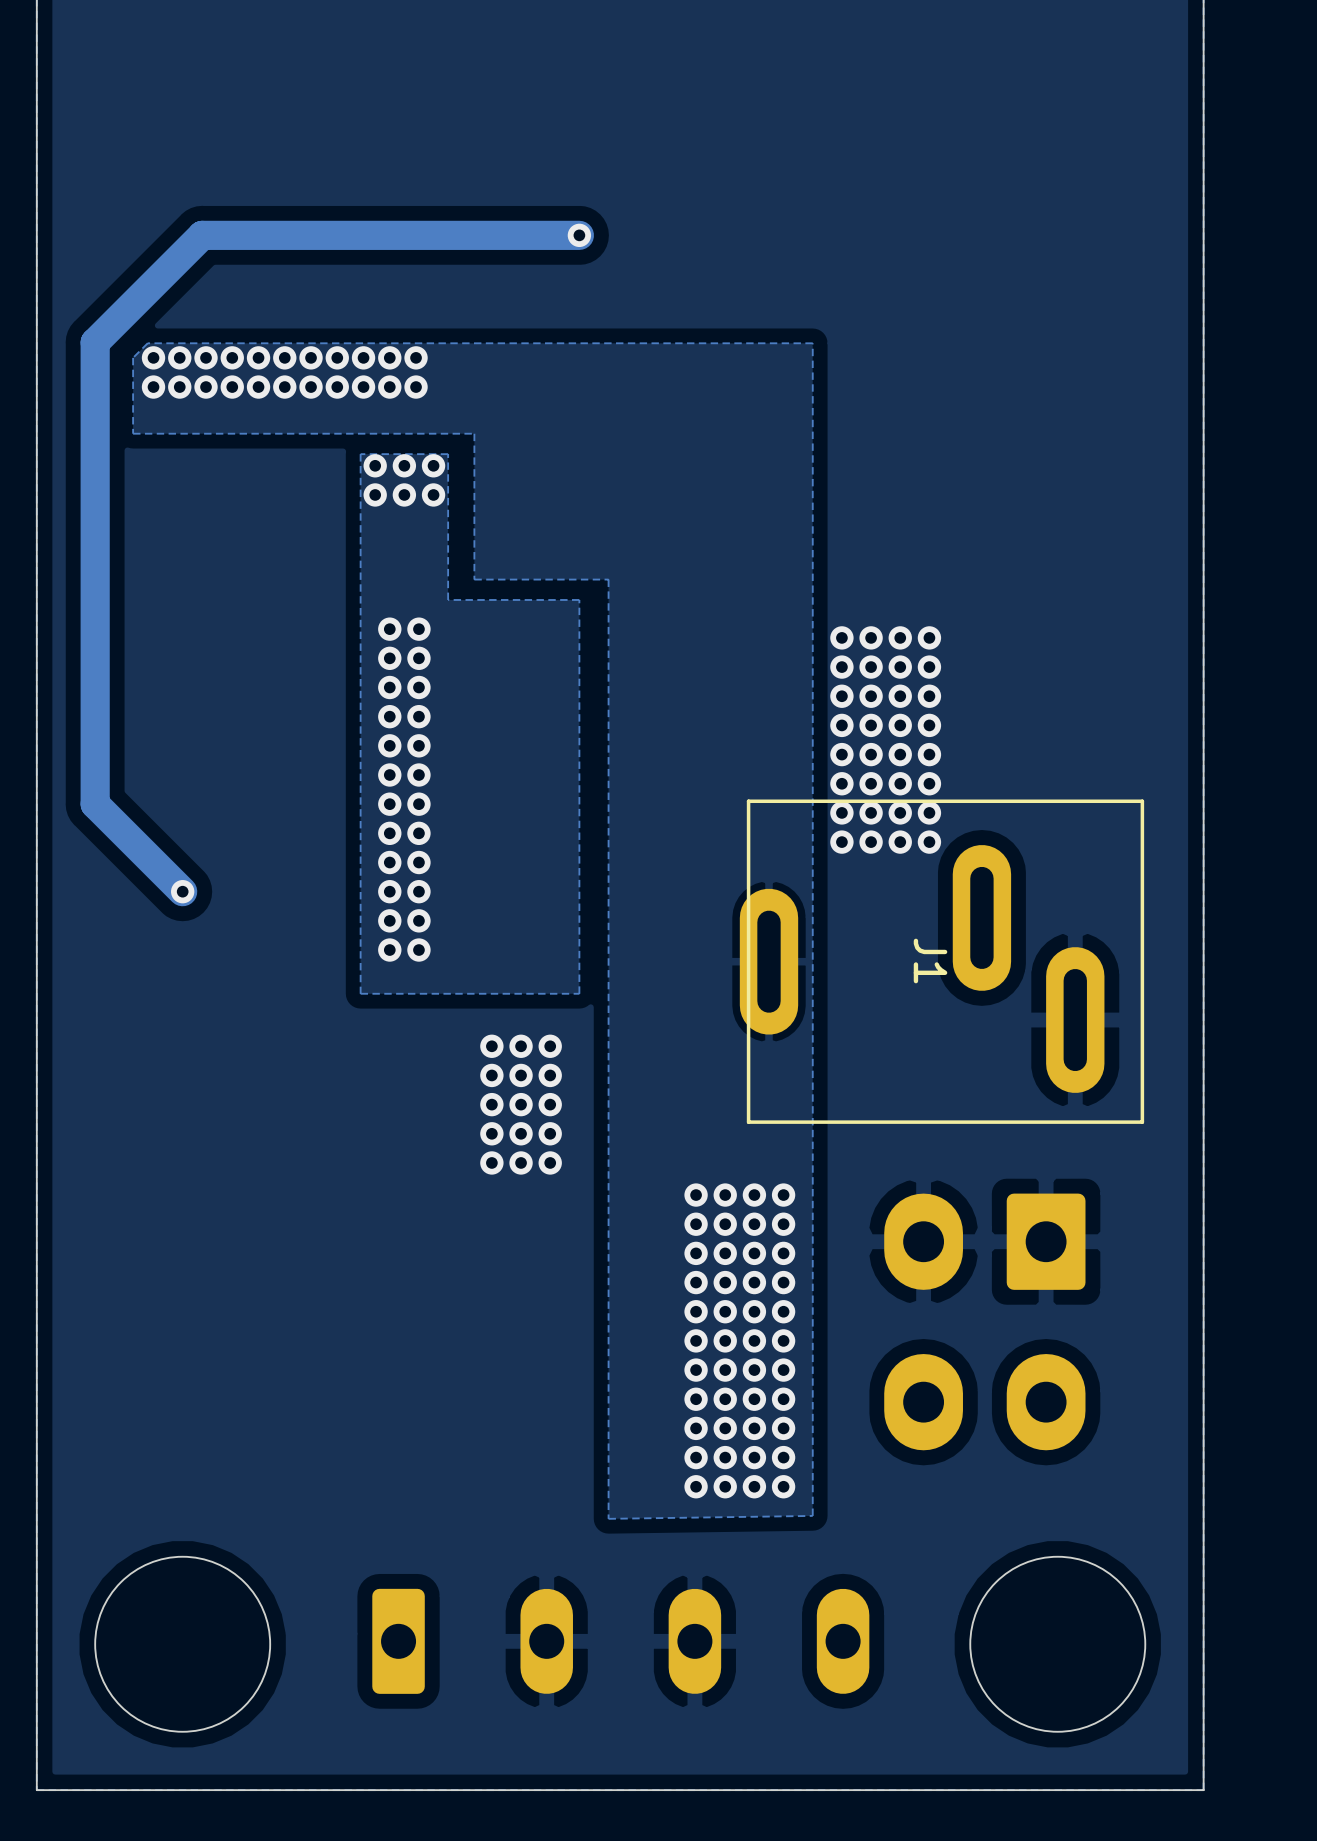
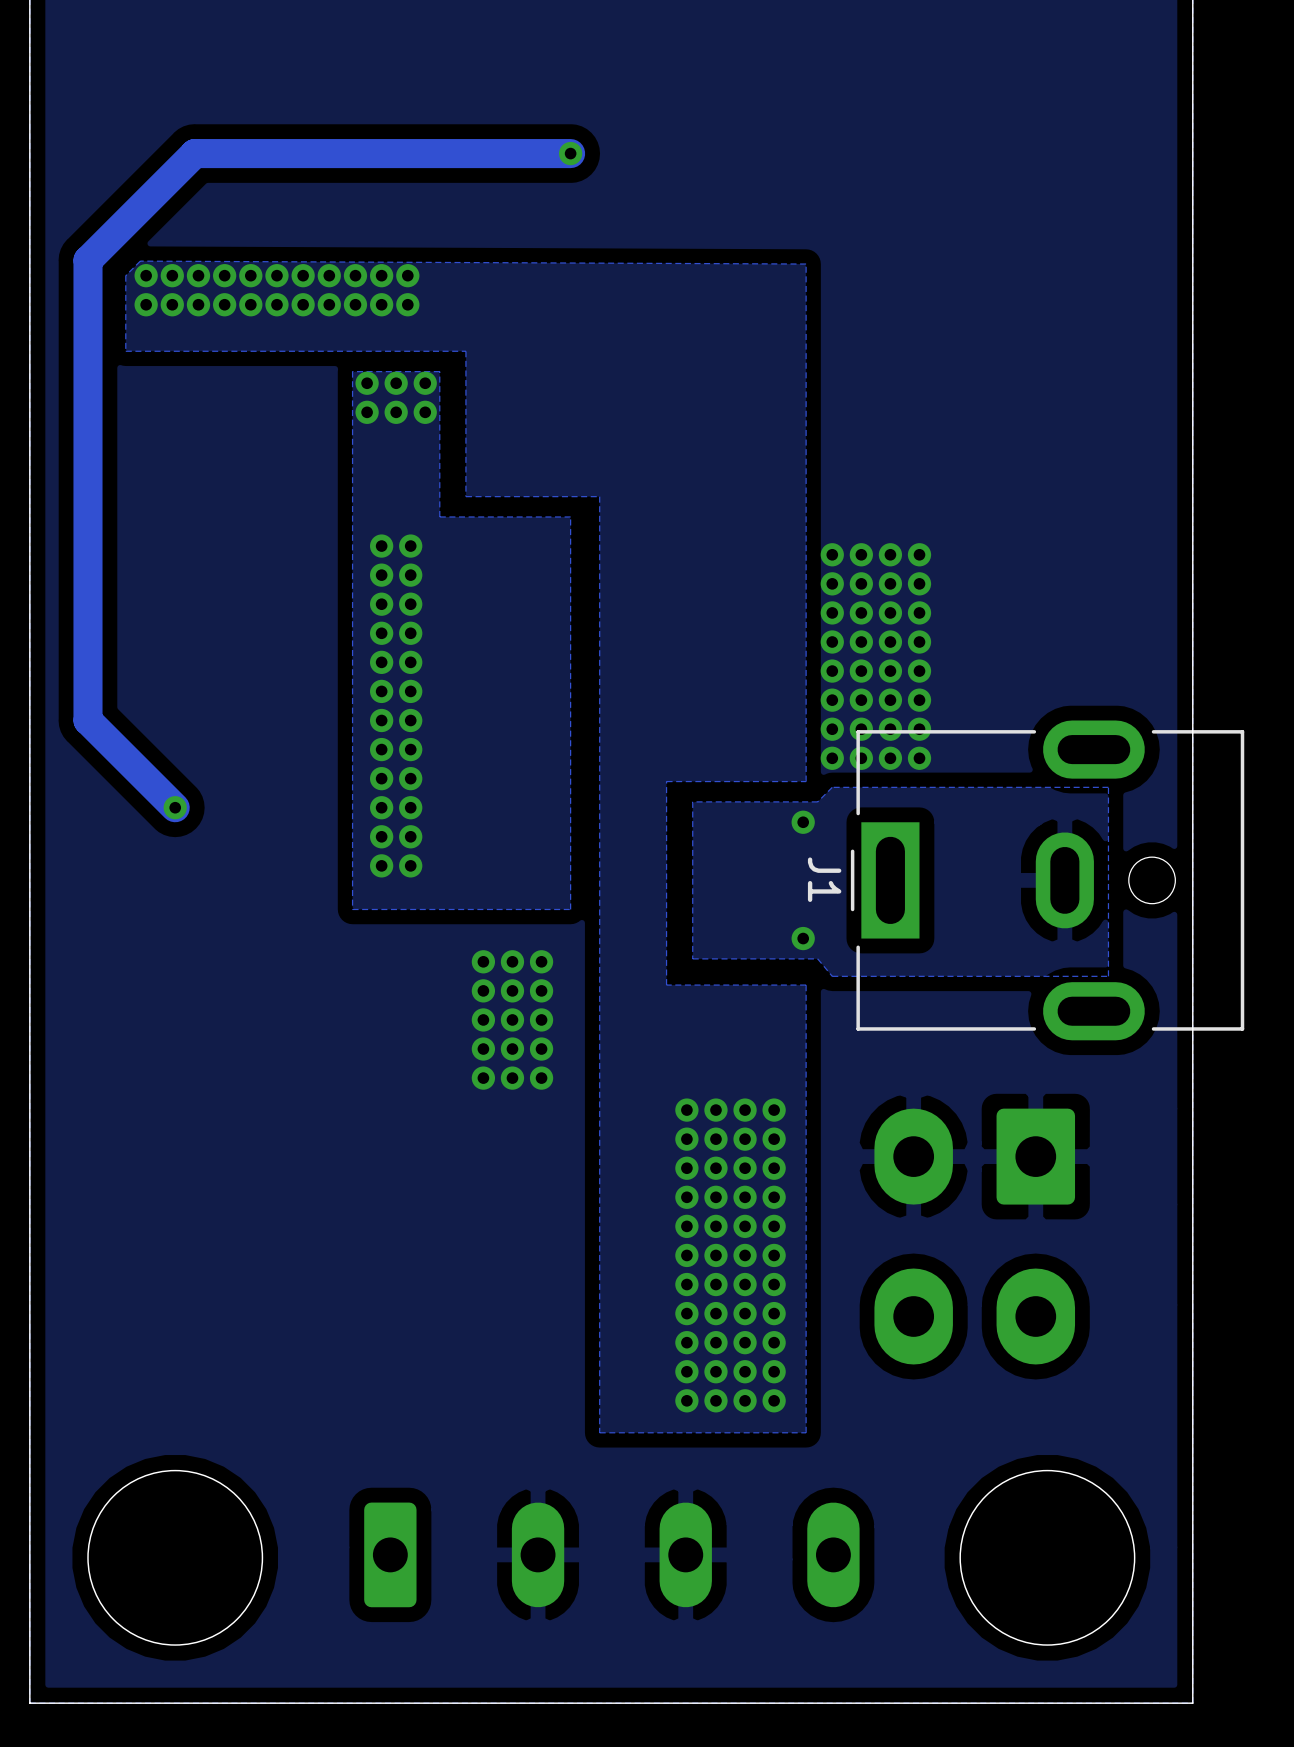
zone outline: (147, 343) (812, 343) (812, 1515) (608, 1518) -> (140, 261) (806, 264) (806, 781) (666, 781) (666, 985) (806, 985) (806, 1432) (599, 1432)
J1 footprint: [739, 799, 1145, 1124] -> [850, 720, 1245, 1041]
zone outline: none -> (1108, 787) (1108, 976) (832, 976) (817, 958) (692, 958) (692, 801) (817, 801) (832, 787) (1108, 787)
via: none -> (803, 822)
J1 name position: J1 (930, 961) -> J1 (824, 879)
via: none -> (803, 938)

